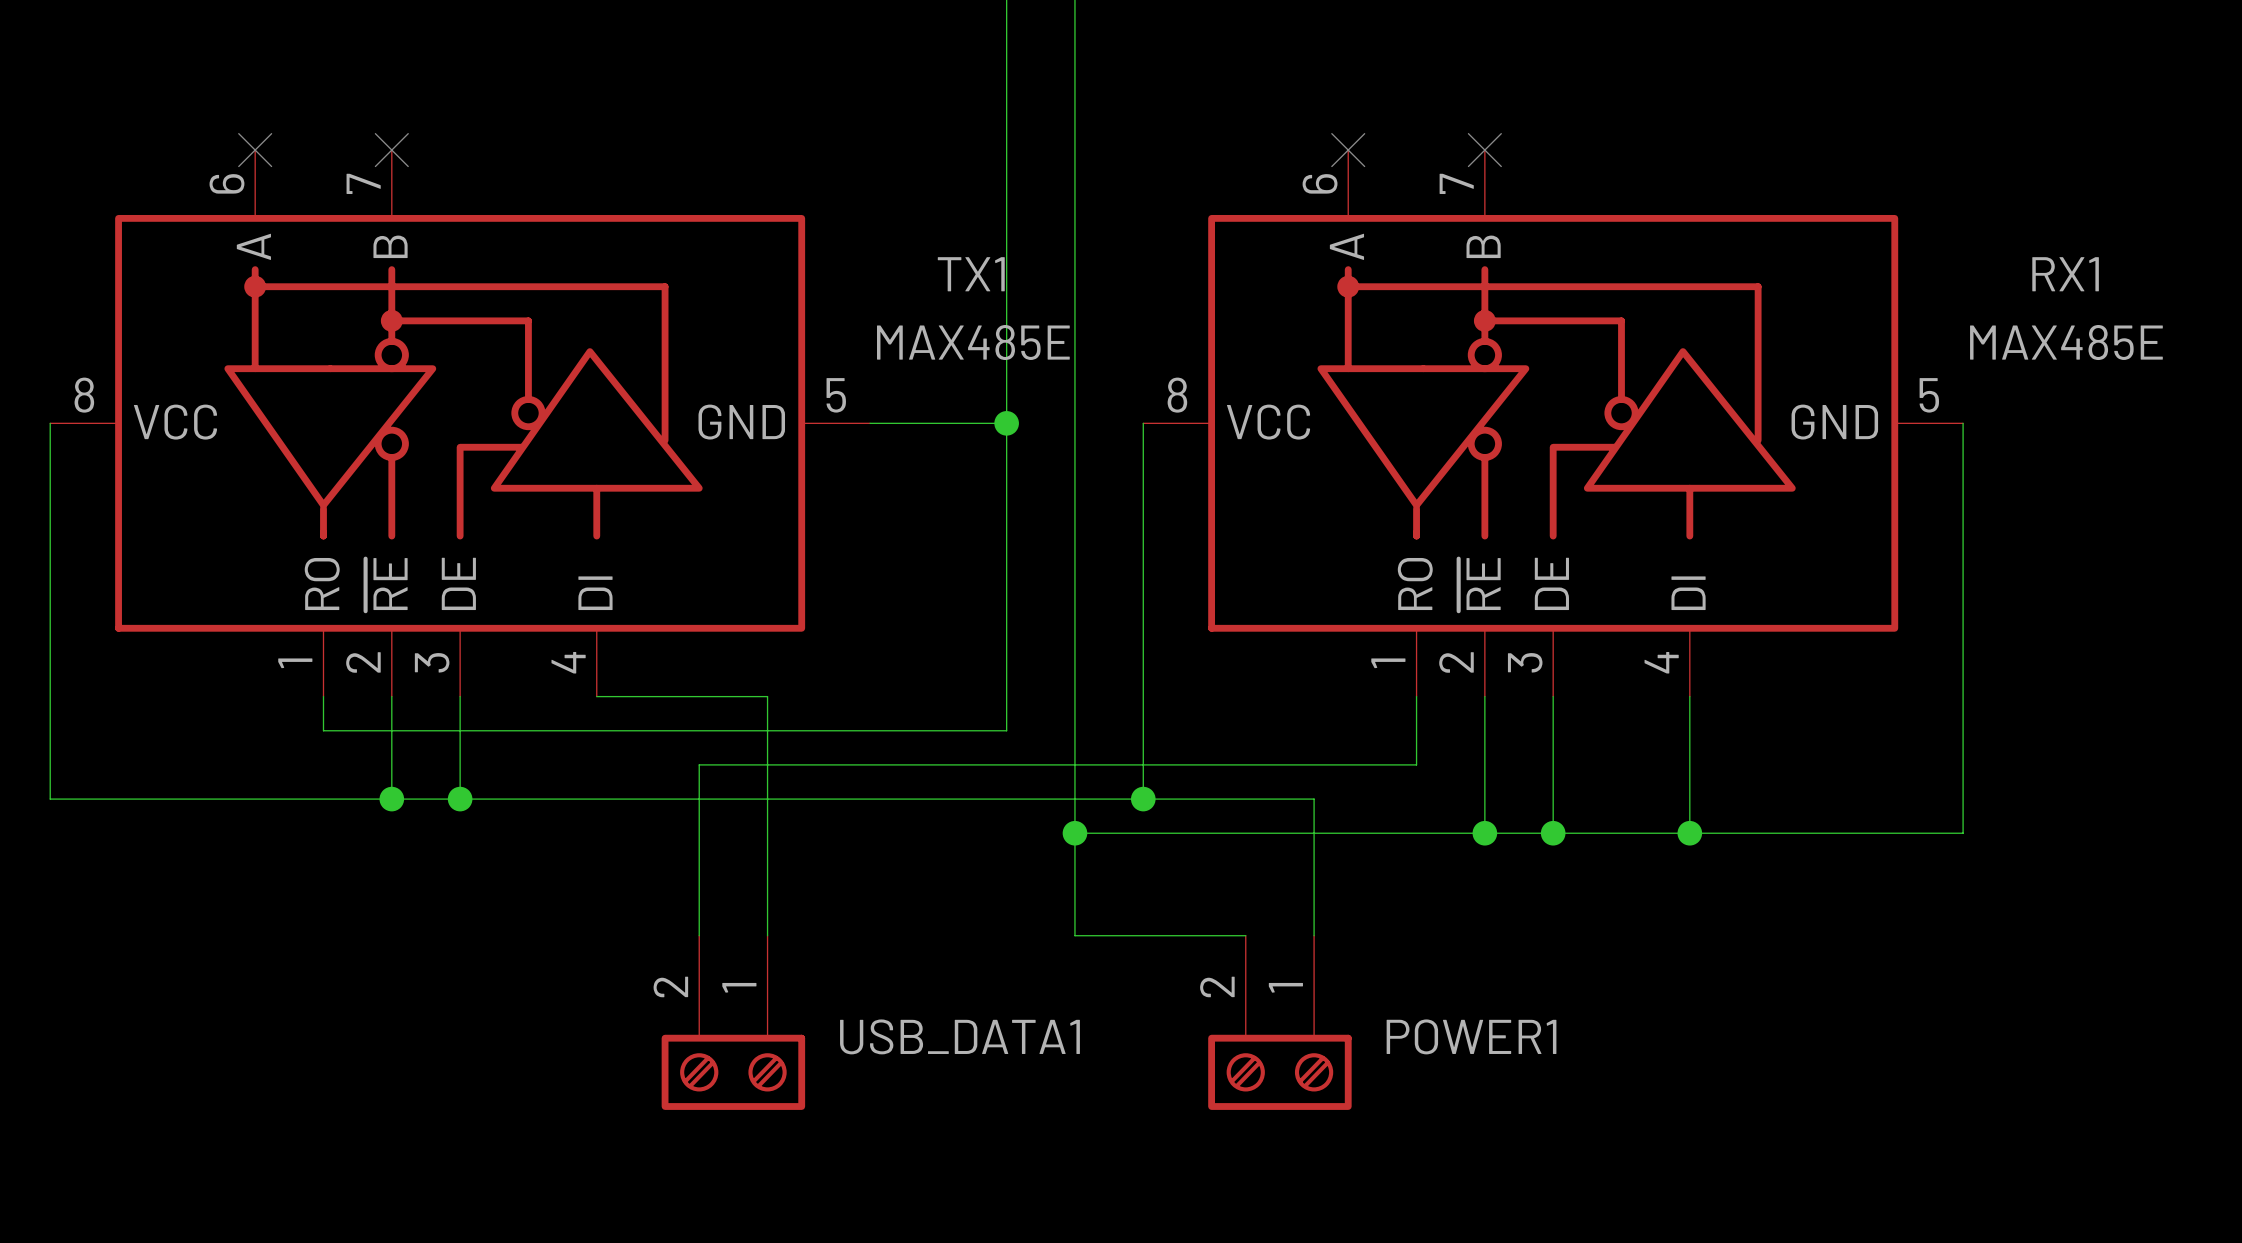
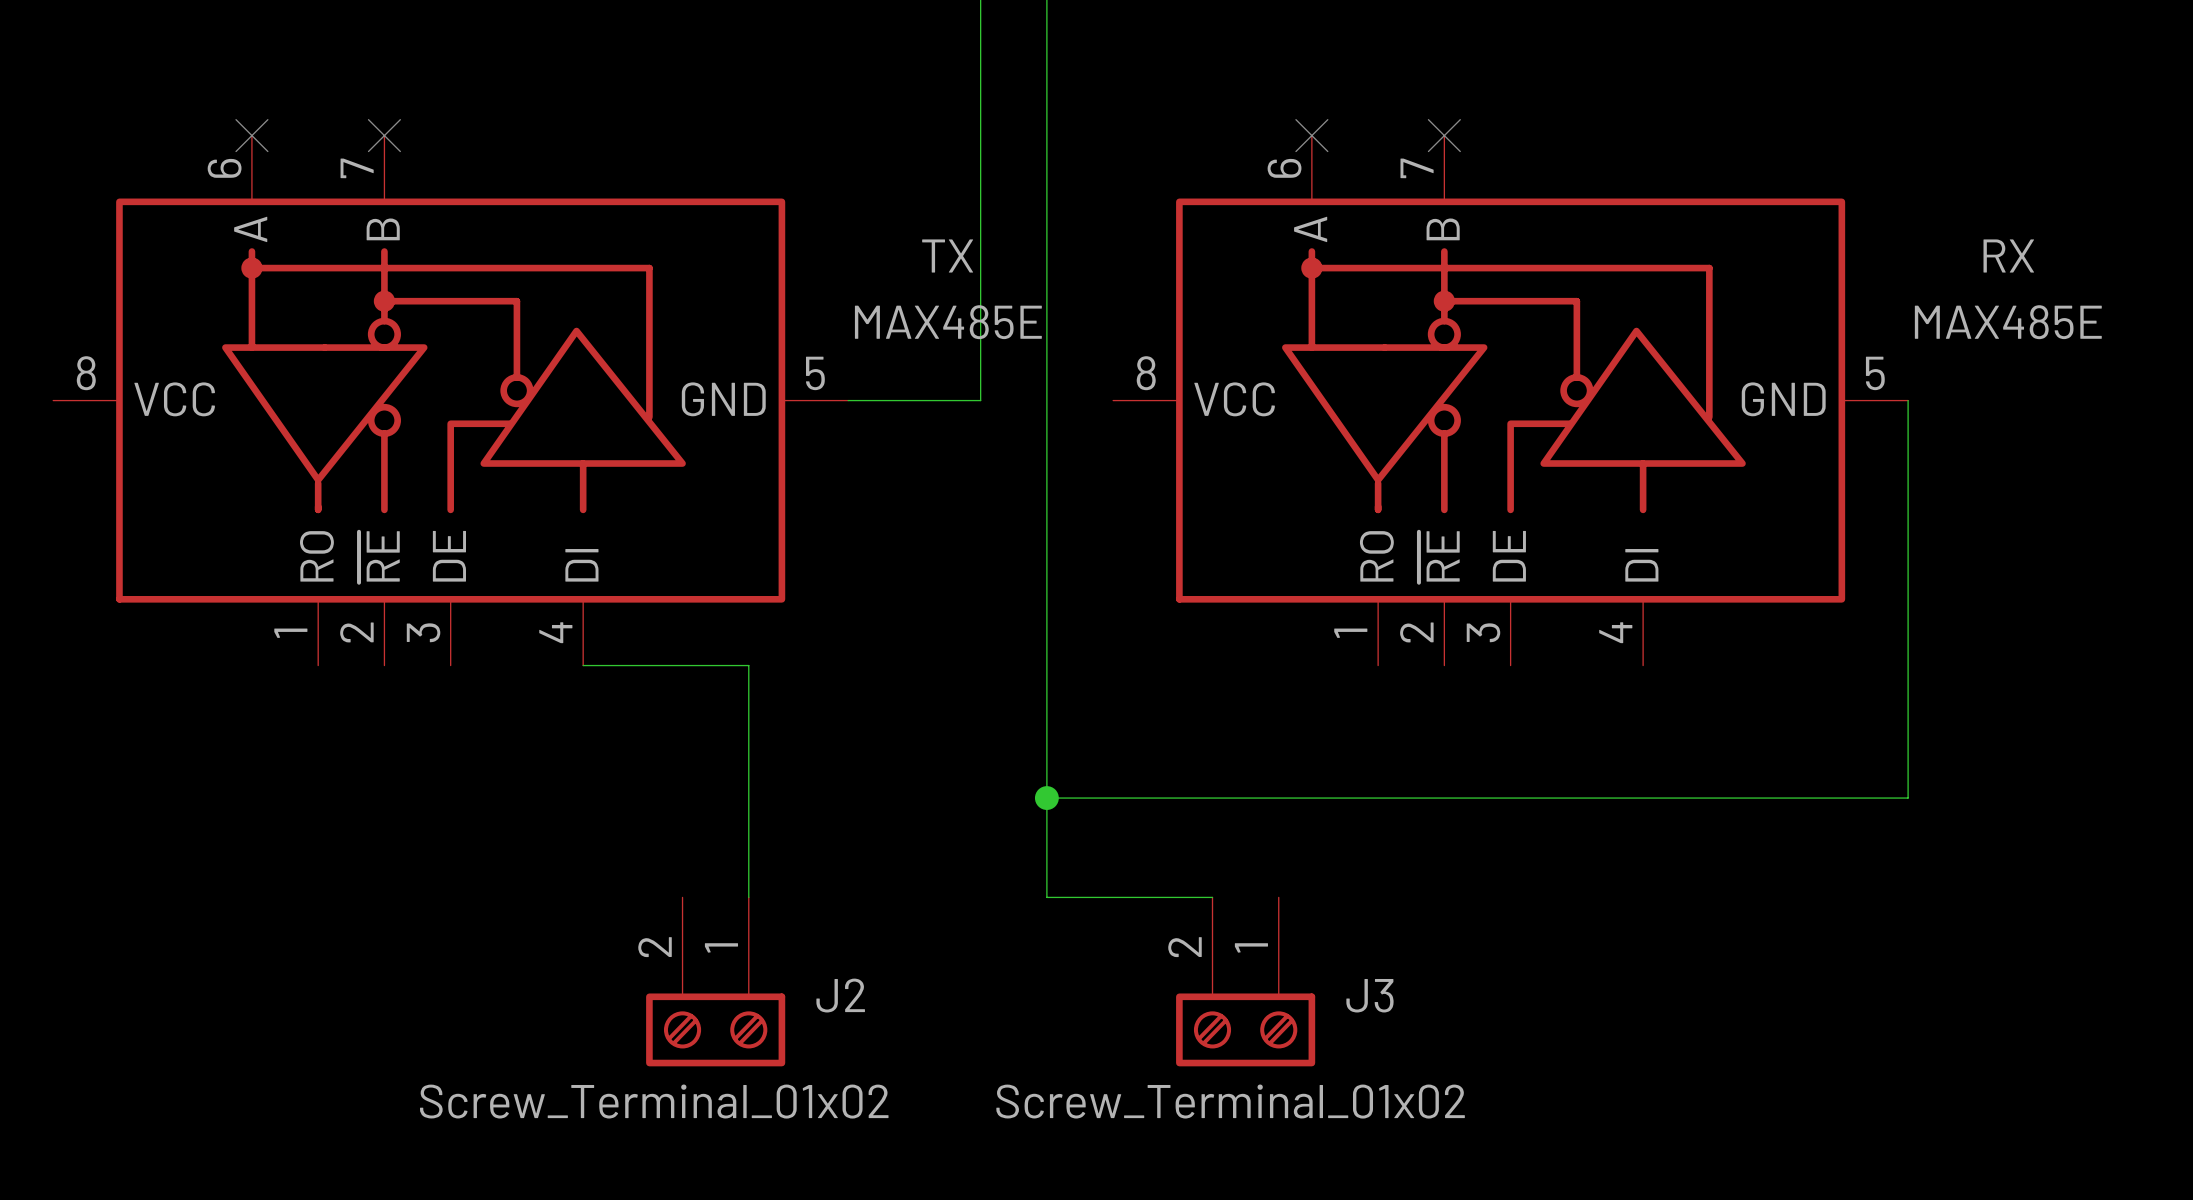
TX1 name: TX1 (971, 274) -> TX (947, 255)
RX1 name: RX1 (2065, 274) -> RX (2008, 255)
wire: (50, 423) (50, 799) (1314, 799) (1314, 935) -> none
wire: (1006, 423) (1006, 730) (323, 730) (323, 696) -> none
junction: (1006, 423) -> none
wire: (1143, 423) (1143, 799) -> none
wire: (391, 696) (391, 799) -> none
wire: (460, 696) (460, 799) -> none
wire: (1416, 696) (1416, 764) (699, 764) (699, 935) -> none
wire: (1484, 696) (1484, 833) -> none
wire: (1553, 696) (1553, 833) -> none
wire: (1689, 696) (1689, 833) -> none
junction: (391, 799) -> none
junction: (460, 799) -> none
junction: (1143, 799) -> none
junction: (1484, 833) -> none
junction: (1553, 833) -> none
junction: (1689, 833) -> none
USB_DATA1 name: USB_DATA1 (959, 1036) -> J2 (840, 995)
POWER1 name: POWER1 (1471, 1036) -> J3 (1369, 995)
USB_DATA1 value: none -> Screw_Terminal_01x02 (654, 1101)
POWER1 value: none -> Screw_Terminal_01x02 (1230, 1101)

